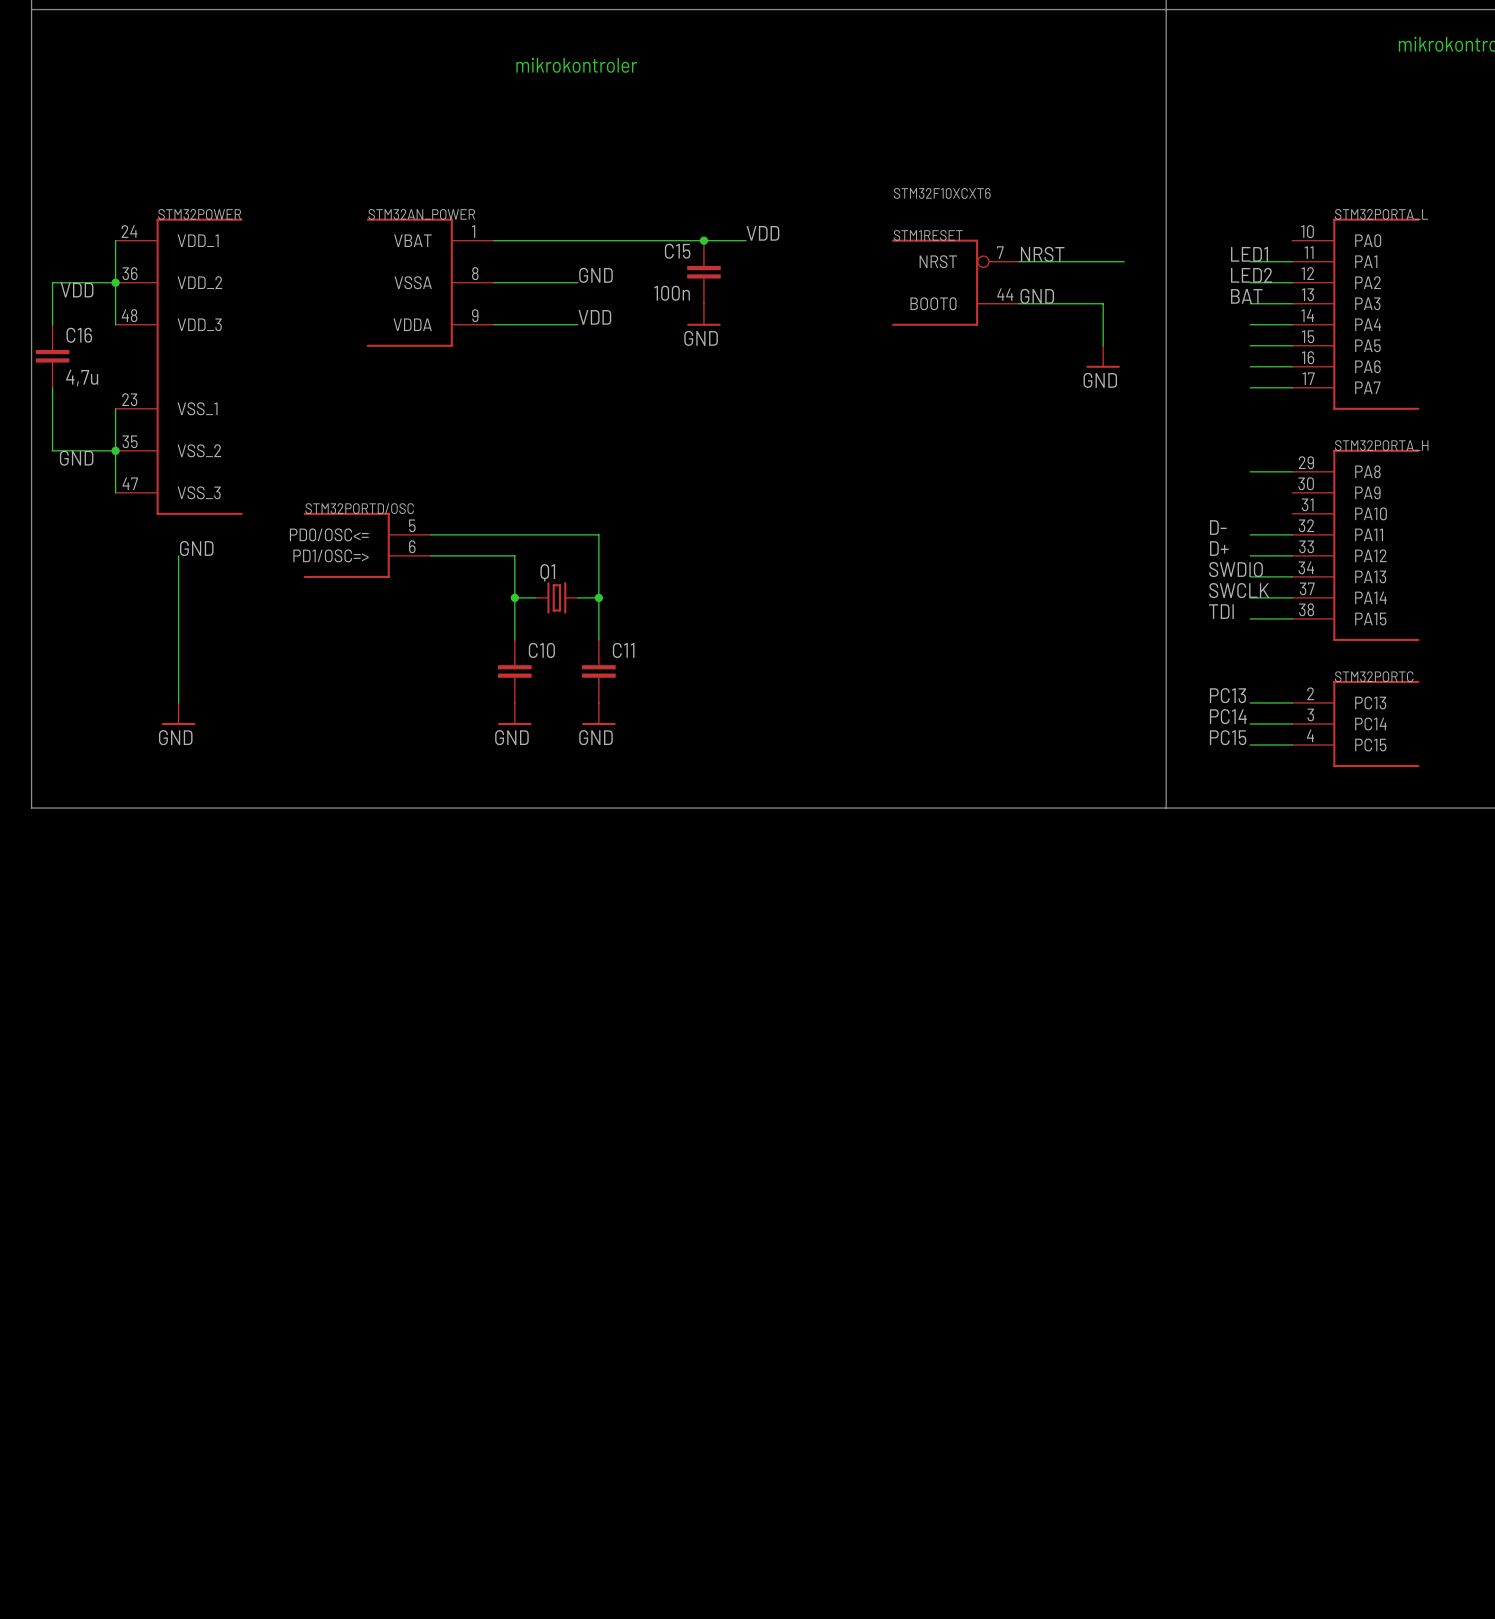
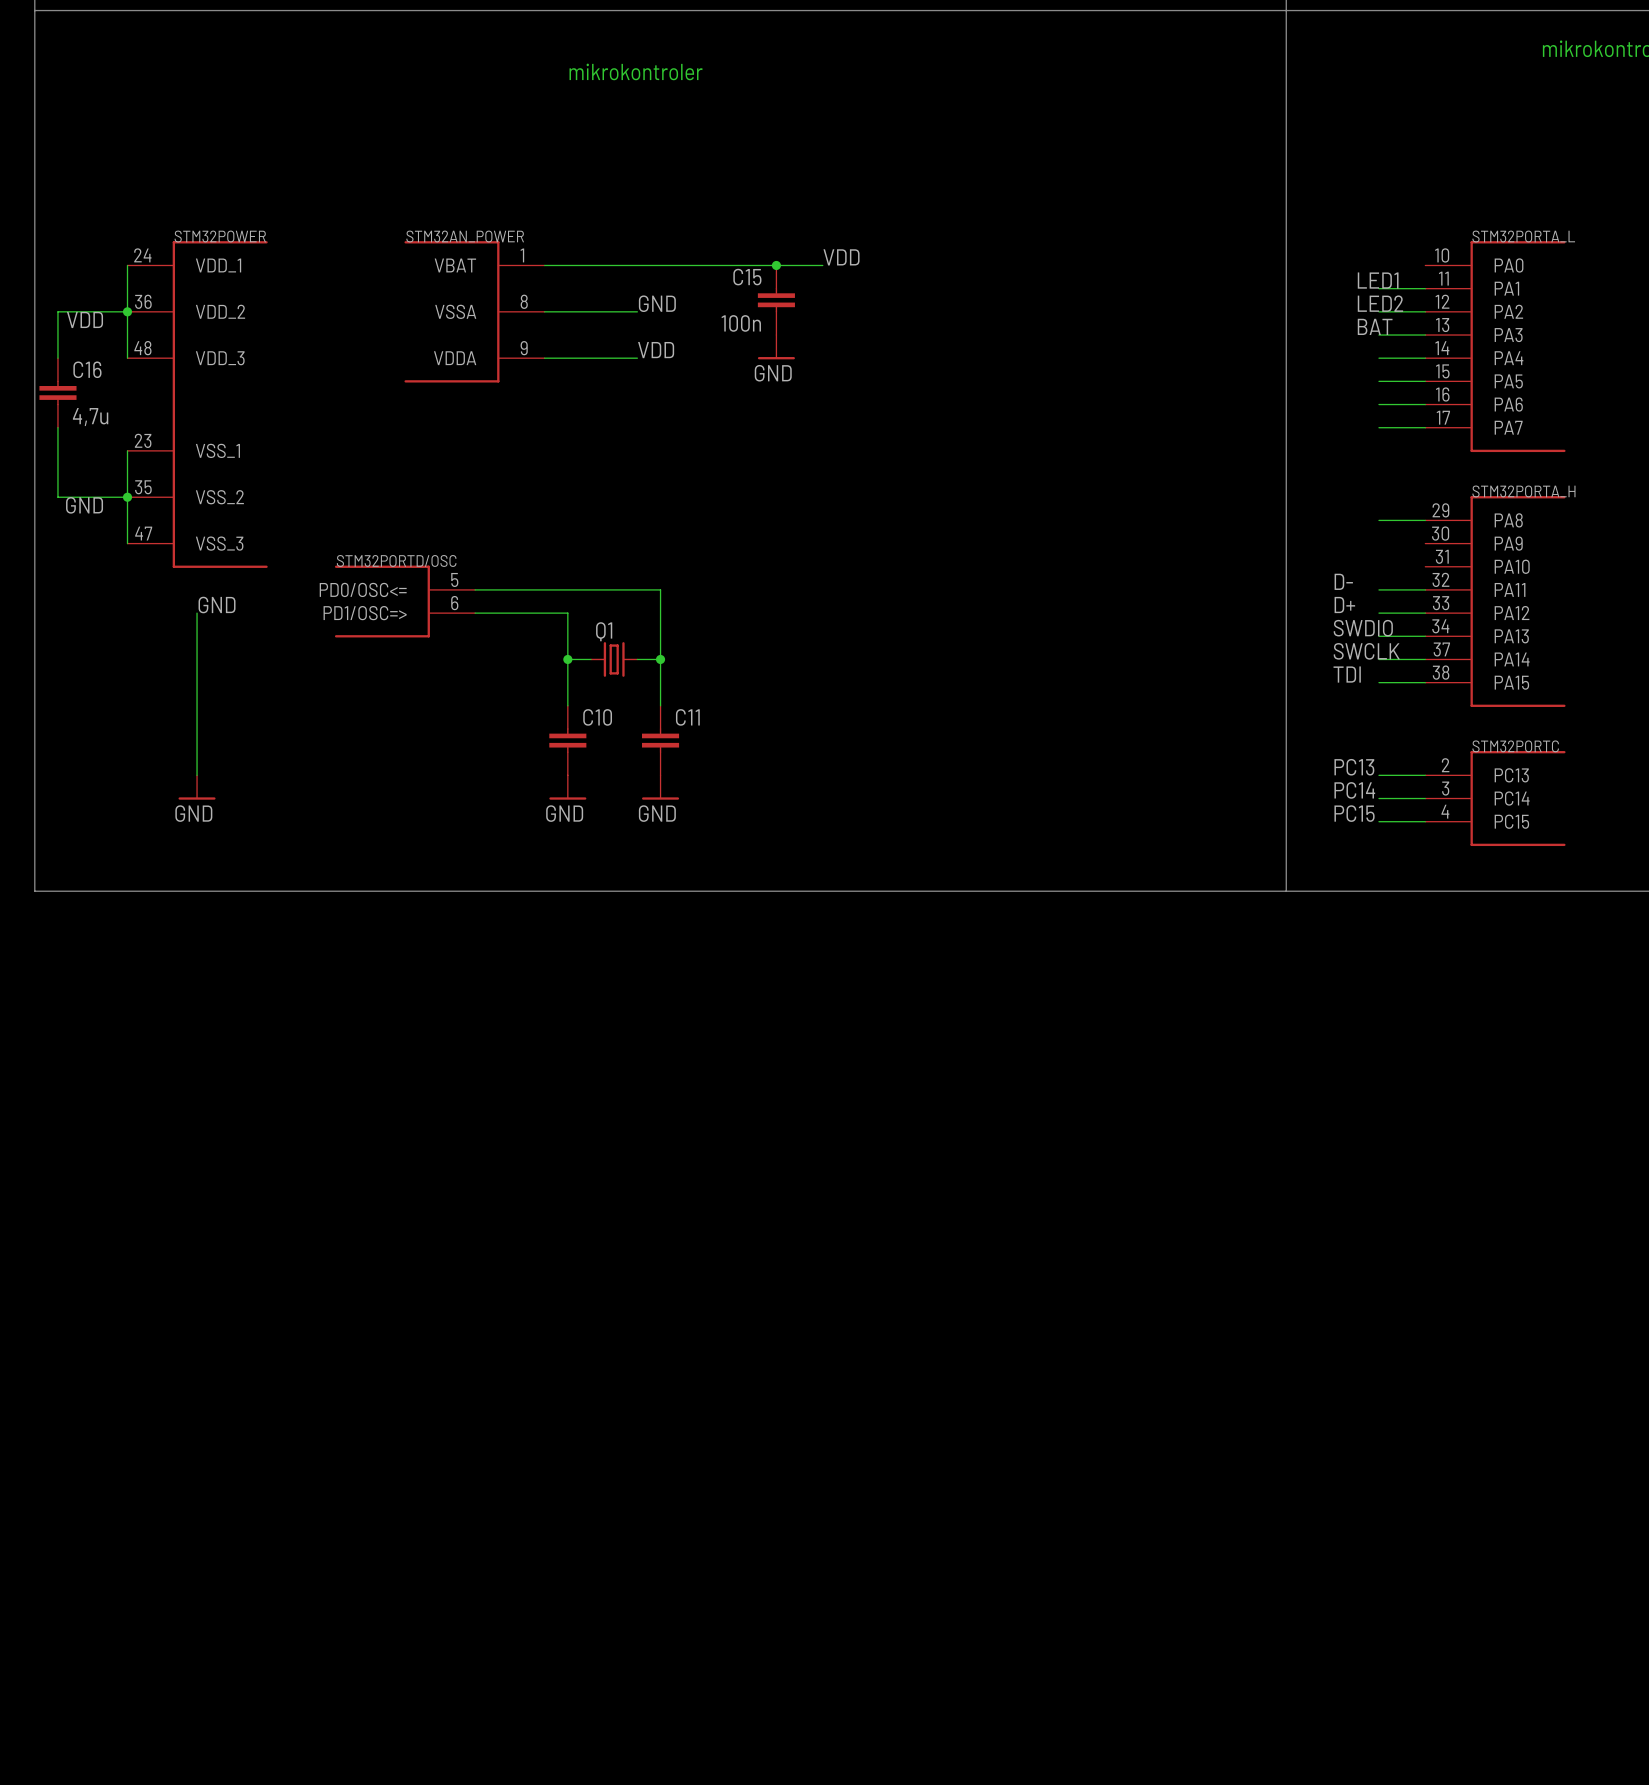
label: NRST (1042, 254) -> none
wire: (1019, 261) (1124, 261) -> none
STM1RESET: STM32F10XCXT6 (955, 282) -> none
label: GND (1037, 296) -> none
wire: (1019, 303) (1103, 303) (1103, 345) -> none
power symbol: GND (1103, 356) -> none

